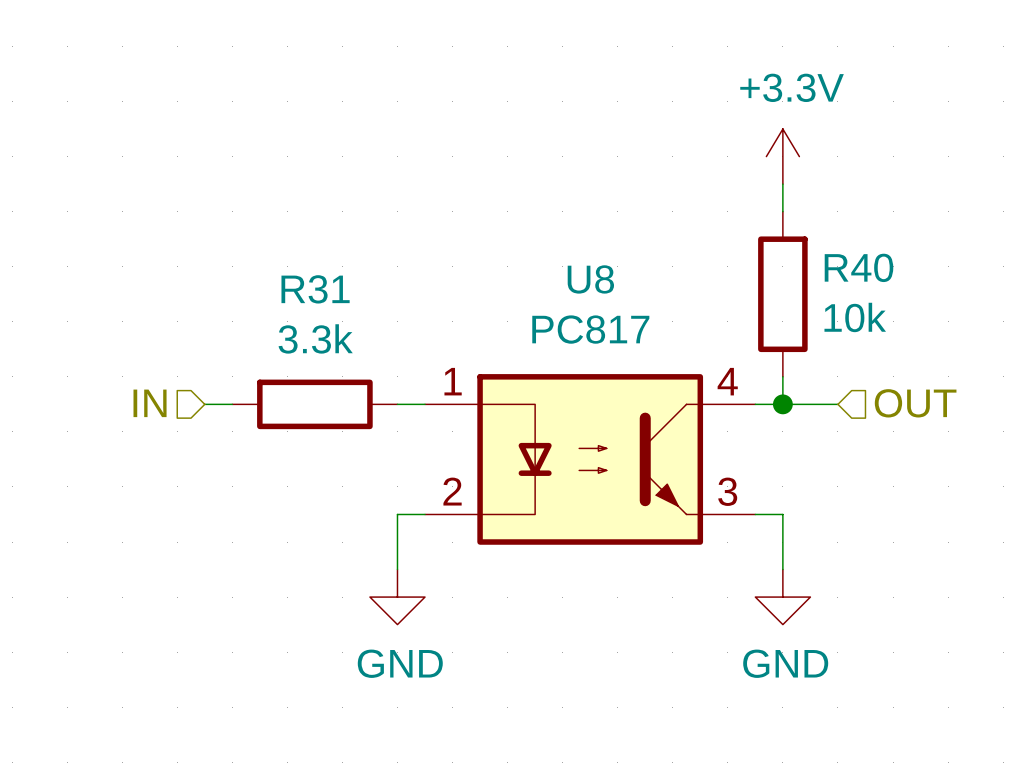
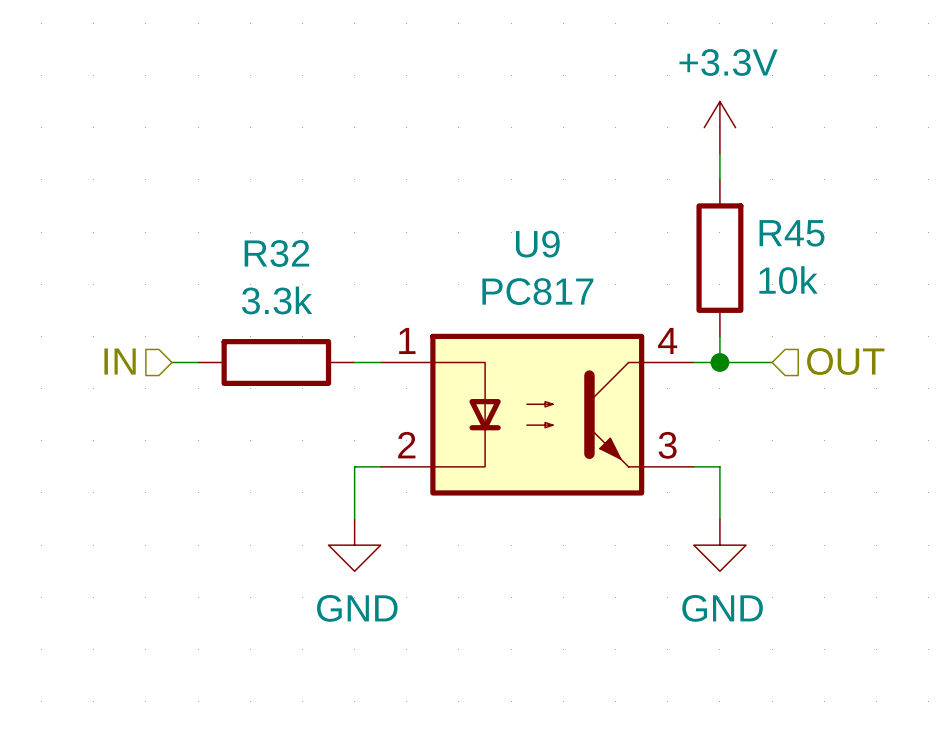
R40 name: R40 (858, 267) -> R45 (792, 233)
U8 name: U8 (590, 279) -> U9 (537, 244)
R31 name: R31 (315, 289) -> R32 (276, 253)

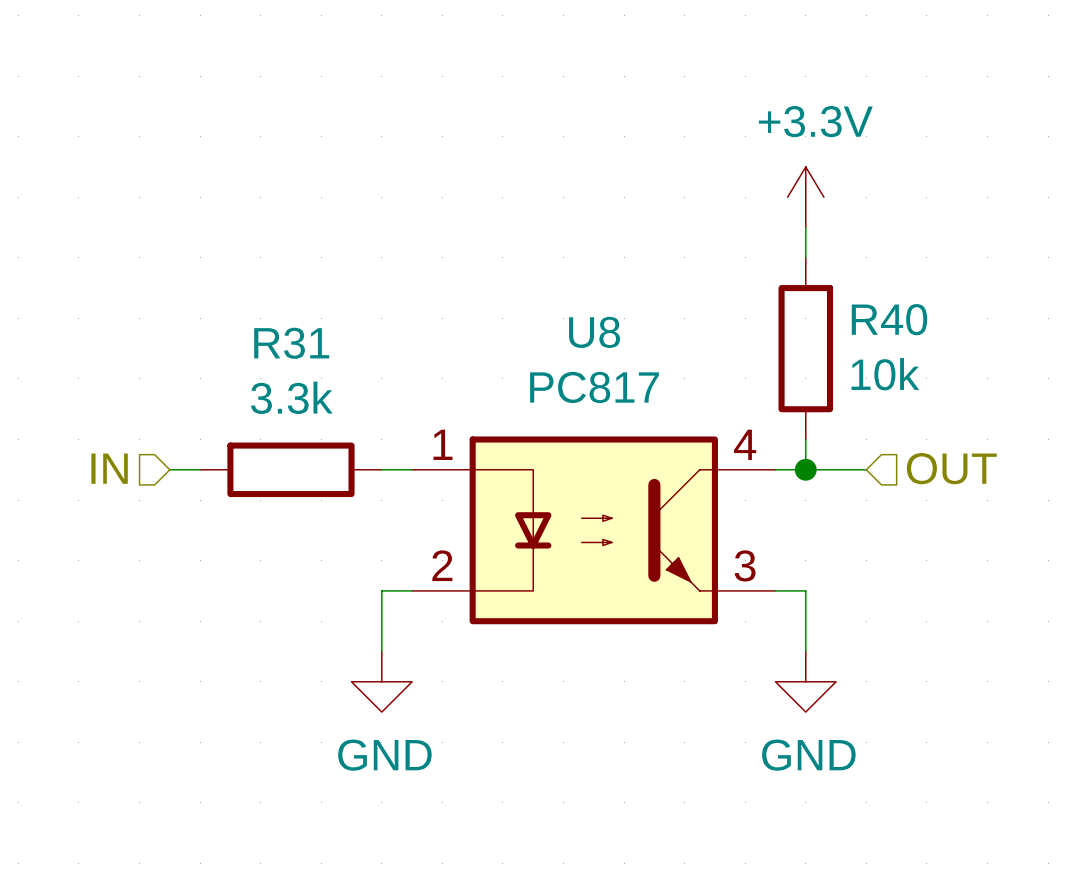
R45 name: R45 (792, 233) -> R40 (889, 319)
U9 name: U9 (537, 244) -> U8 (594, 332)
R32 name: R32 (276, 253) -> R31 (291, 343)

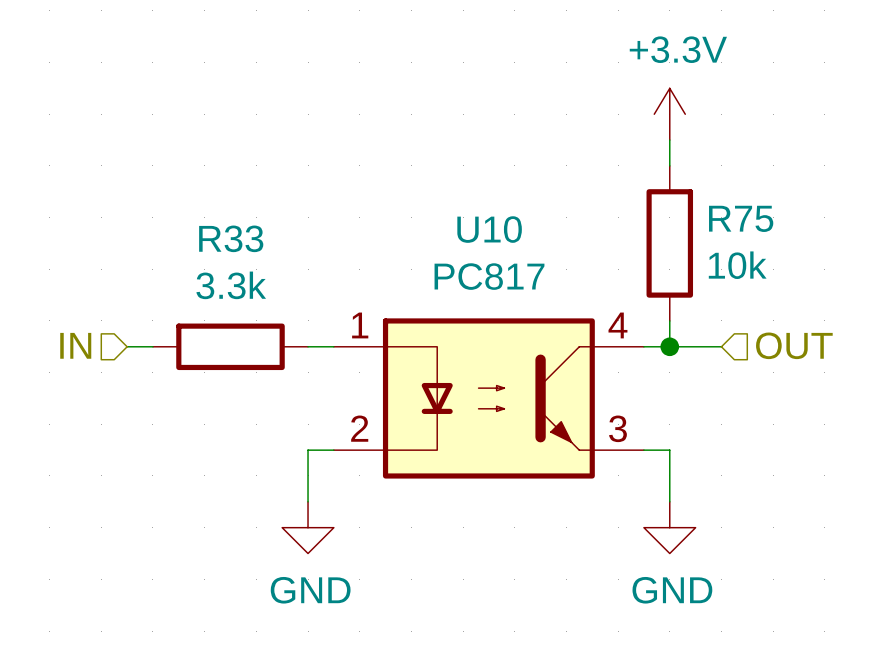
R40 name: R40 (889, 319) -> R75 (741, 218)
U8 name: U8 (594, 332) -> U10 (489, 229)
R31 name: R31 (291, 343) -> R33 (231, 238)

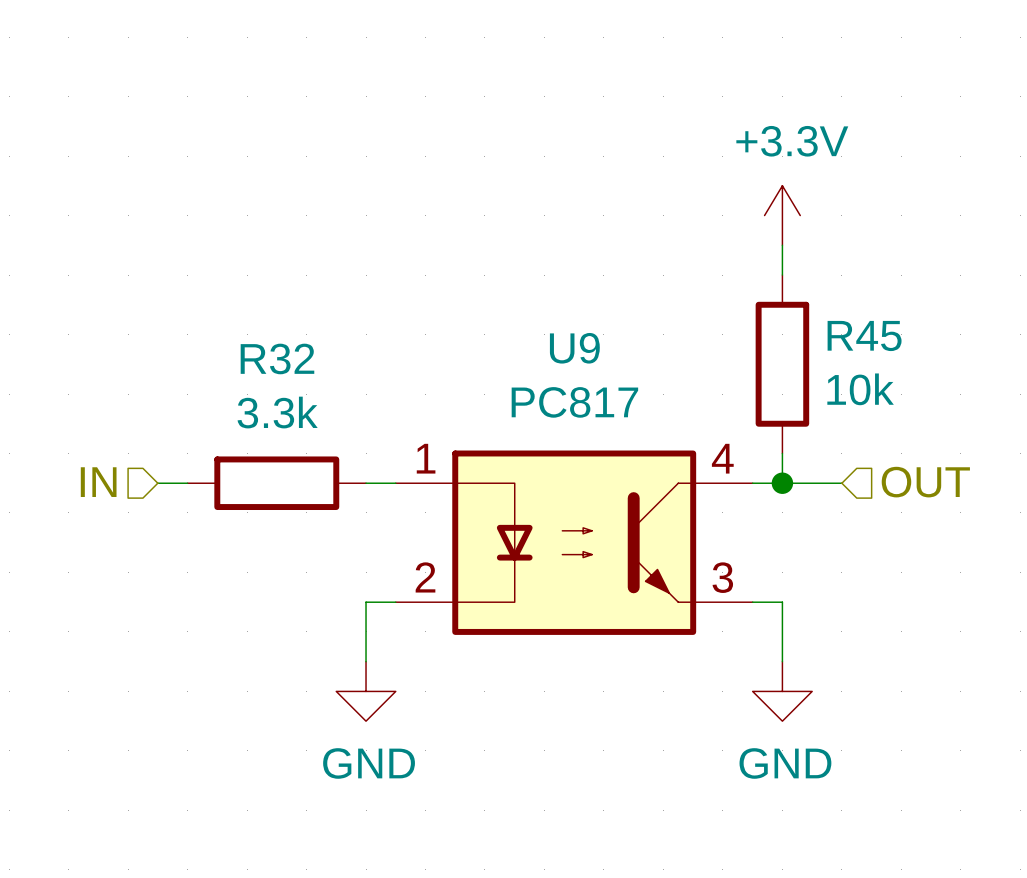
R75 name: R75 (741, 218) -> R45 (864, 336)
U10 name: U10 (489, 229) -> U9 (574, 348)
R33 name: R33 (231, 238) -> R32 (277, 358)

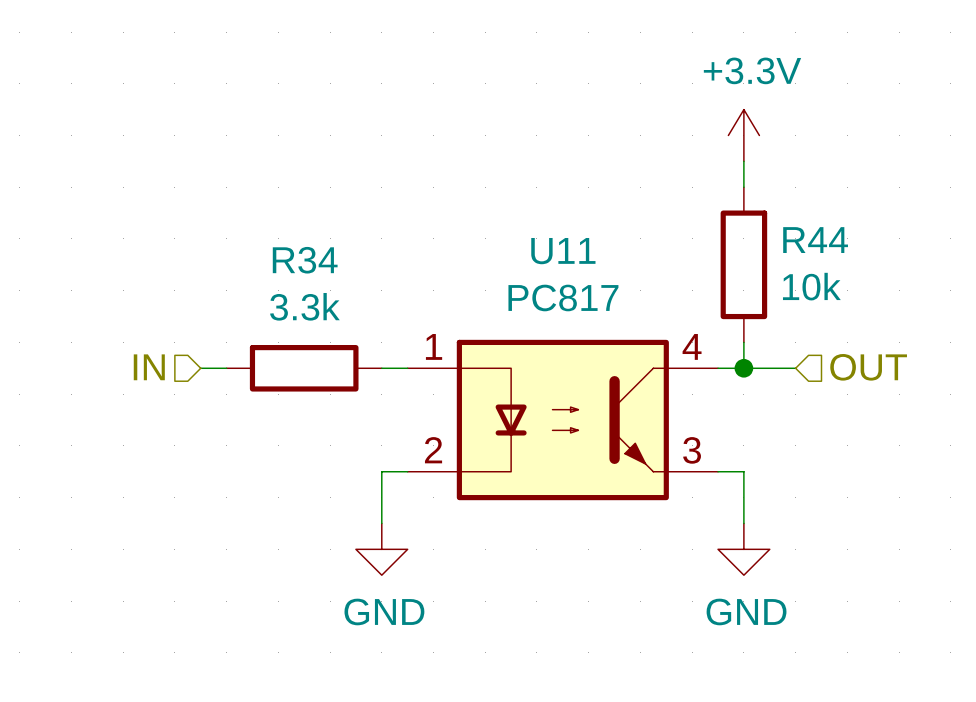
R45 name: R45 (864, 336) -> R44 (815, 240)
U9 name: U9 (574, 348) -> U11 (563, 251)
R32 name: R32 (277, 358) -> R34 (305, 260)

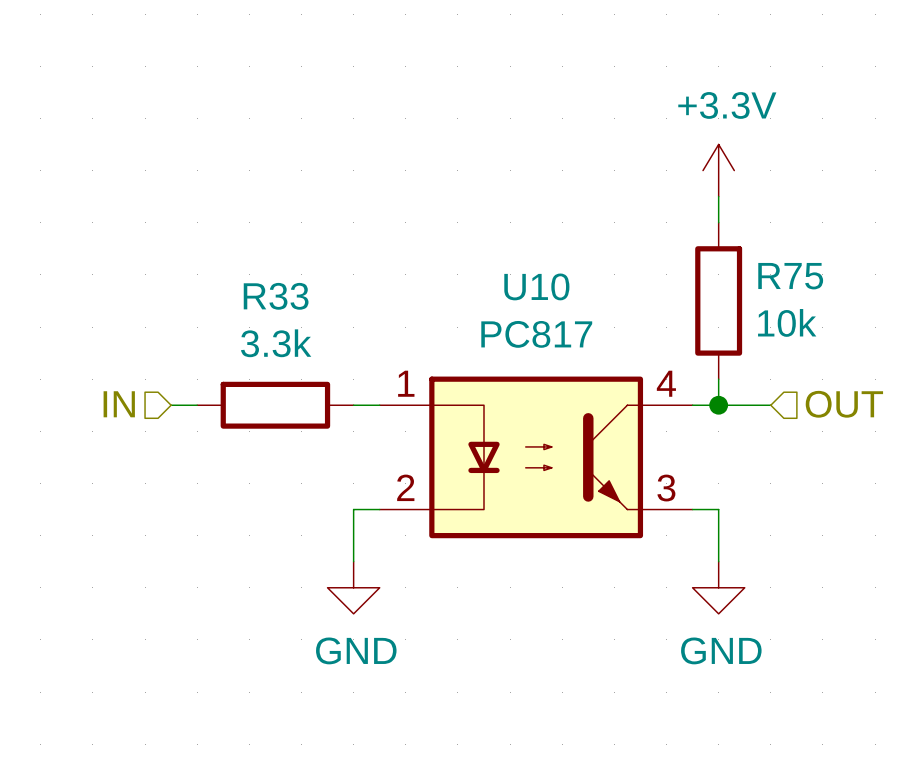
R44 name: R44 (815, 240) -> R75 (790, 276)
U11 name: U11 (563, 251) -> U10 (536, 286)
R34 name: R34 (305, 260) -> R33 (276, 296)

